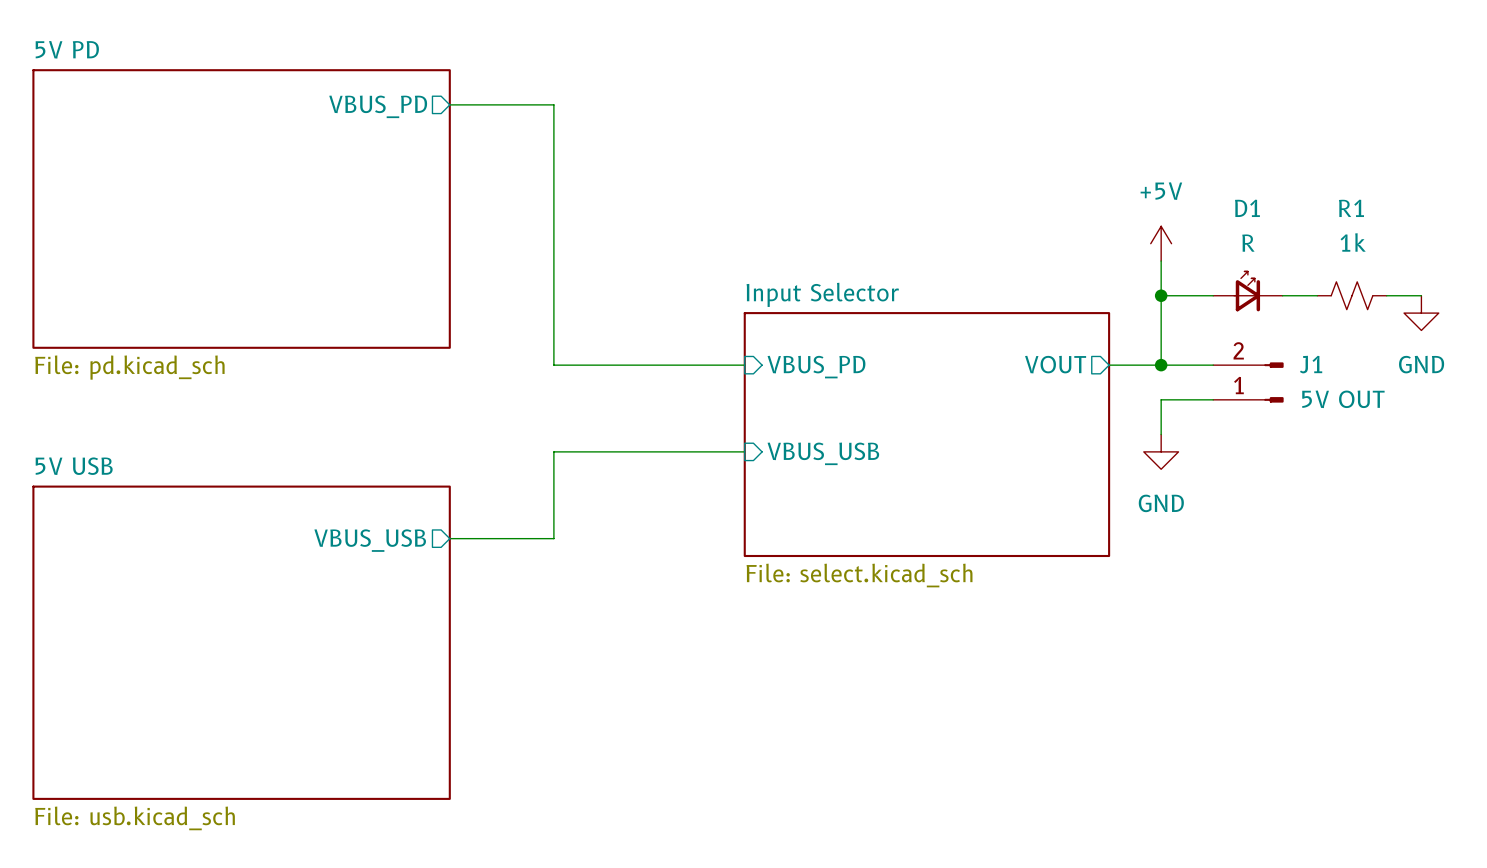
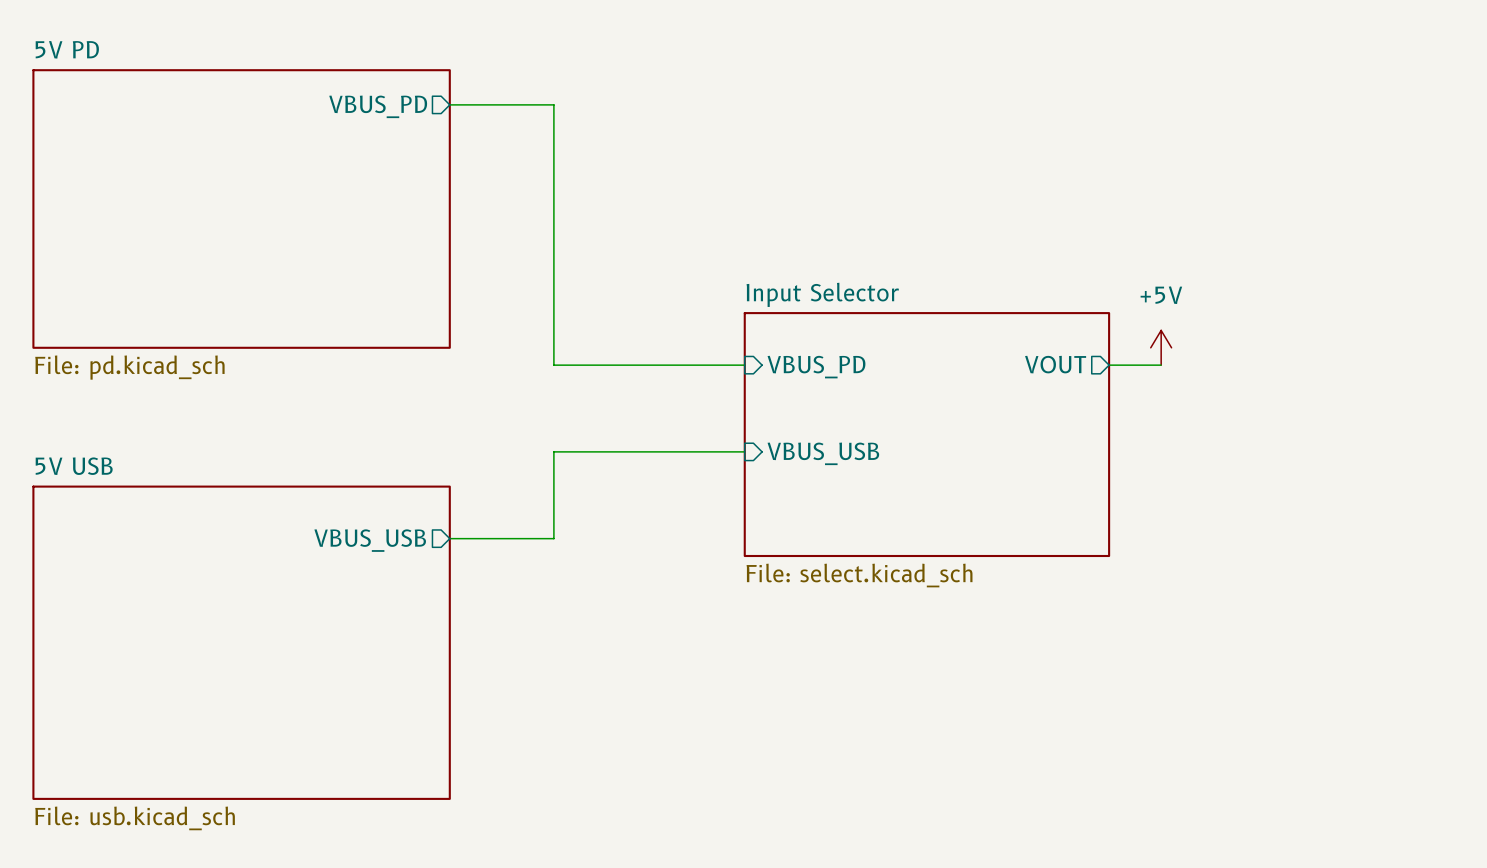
power symbol position: +5V (1161, 243) -> +5V (1161, 347)
wire: (1161, 261) (1161, 365) (1213, 365) -> none
D1: R (1247, 291) -> none
wire: (1161, 295) (1213, 295) -> none
junction: (1161, 295) -> none
wire: (1282, 295) (1317, 295) -> none
R1: 1k (1352, 295) -> none
wire: (1386, 295) (1421, 295) -> none
power symbol: GND (1421, 313) -> none
junction: (1161, 365) -> none
J1: 5V OUT (1248, 382) -> none
wire: (1213, 399) (1161, 399) (1161, 434) -> none
power symbol: GND (1161, 451) -> none

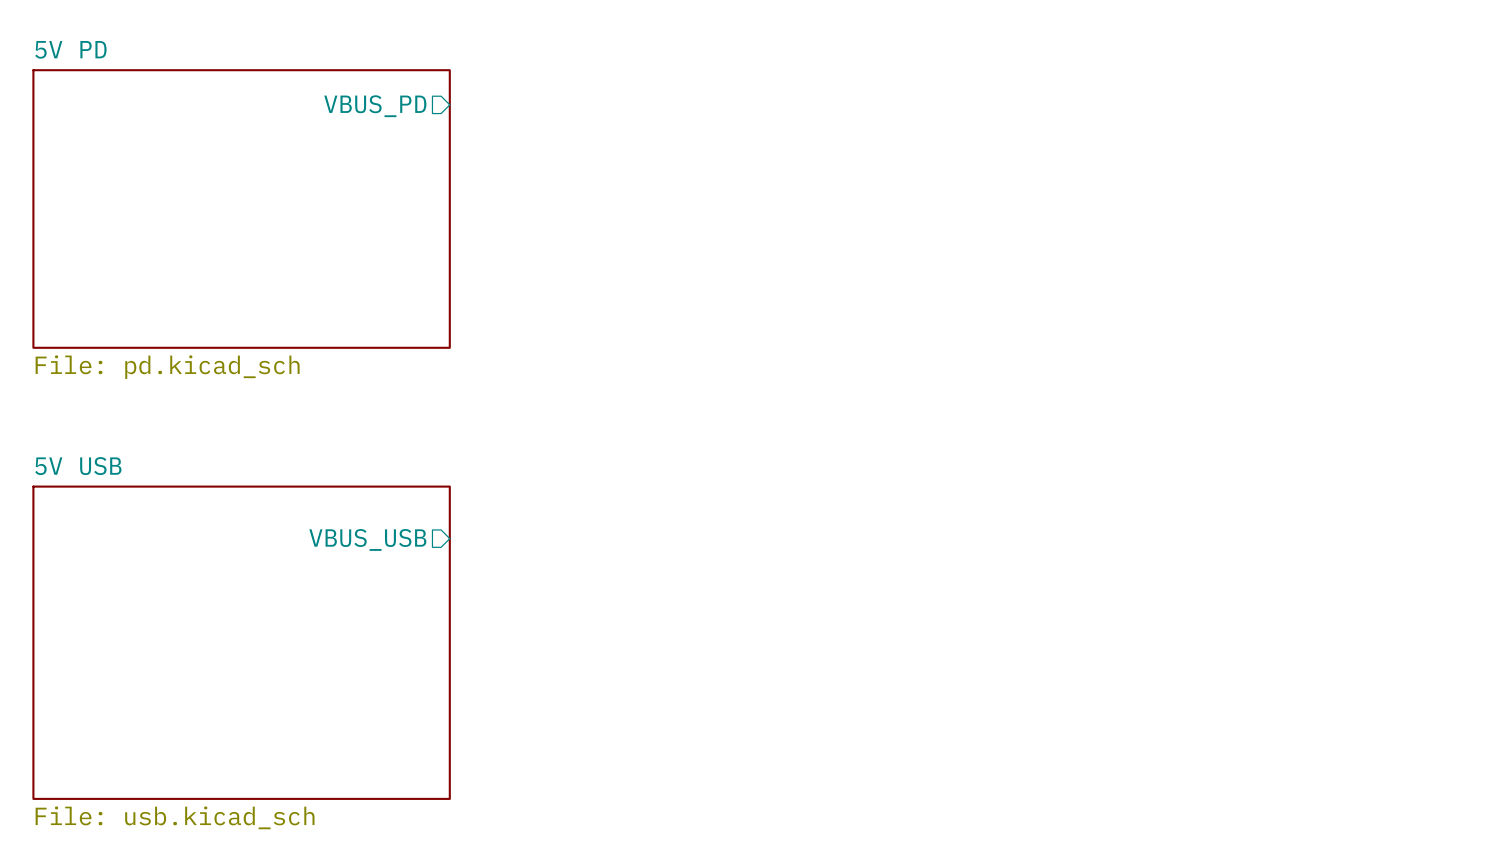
wire: (449, 104) (553, 104) (553, 365) (744, 365) -> none
power symbol: +5V (1161, 347) -> none
sheet pin: VOUT (1055, 364) -> none
wire: (1109, 365) (1161, 365) -> none
sheet pin: VBUS_PD (816, 367) -> none
sheet Input Selector: File: select.kicad_sch (926, 434) -> none
wire: (744, 451) (553, 451) (553, 538) (449, 538) -> none
sheet pin: VBUS_USB (823, 453) -> none

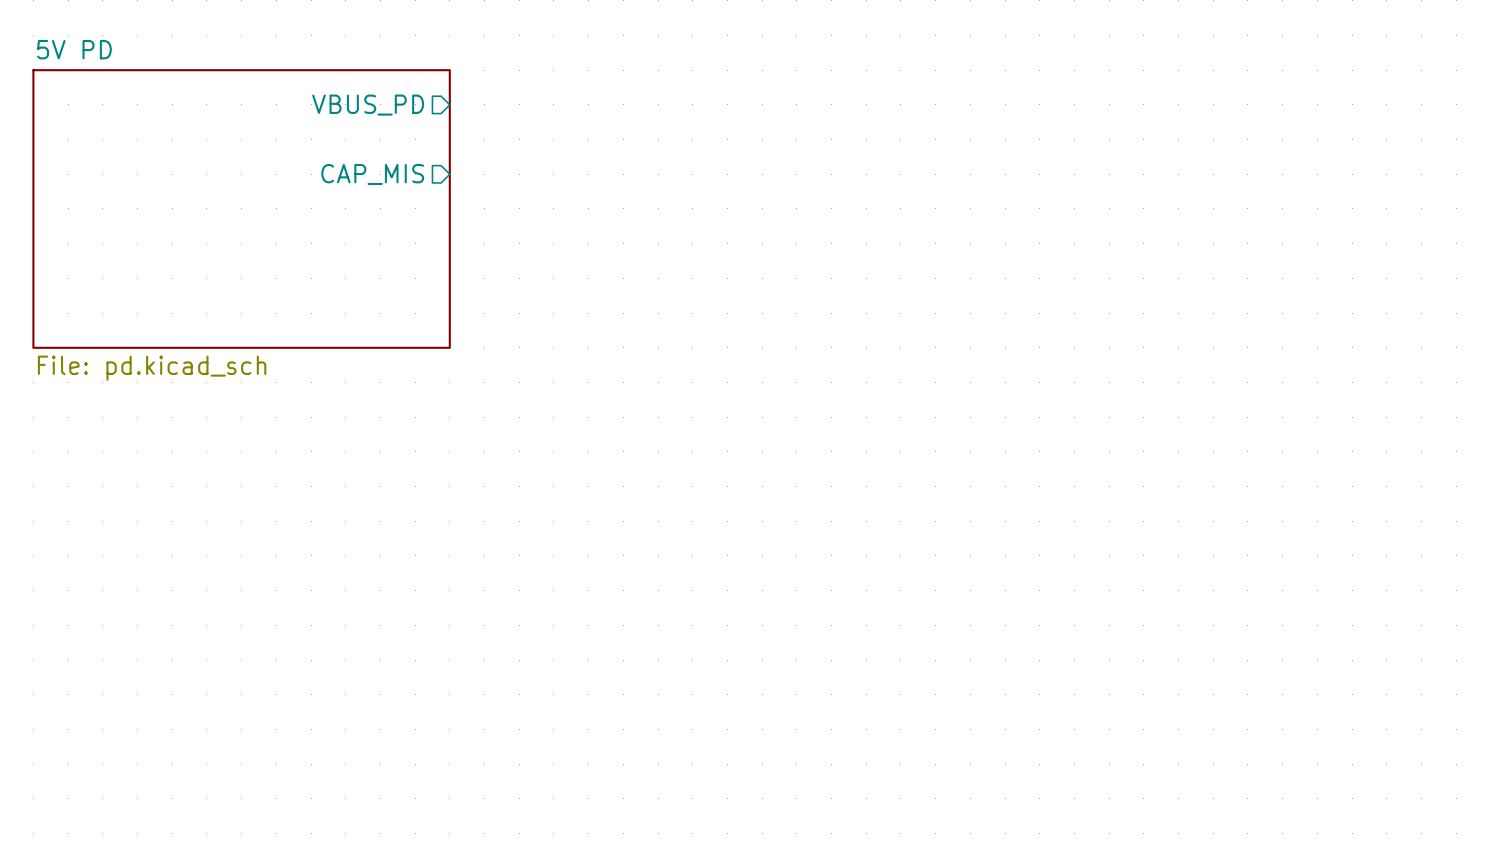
sheet pin: none -> CAP_MIS (372, 174)
sheet pin: VBUS_USB (367, 539) -> none
sheet 5V USB: File: usb.kicad_sch (241, 642) -> none

